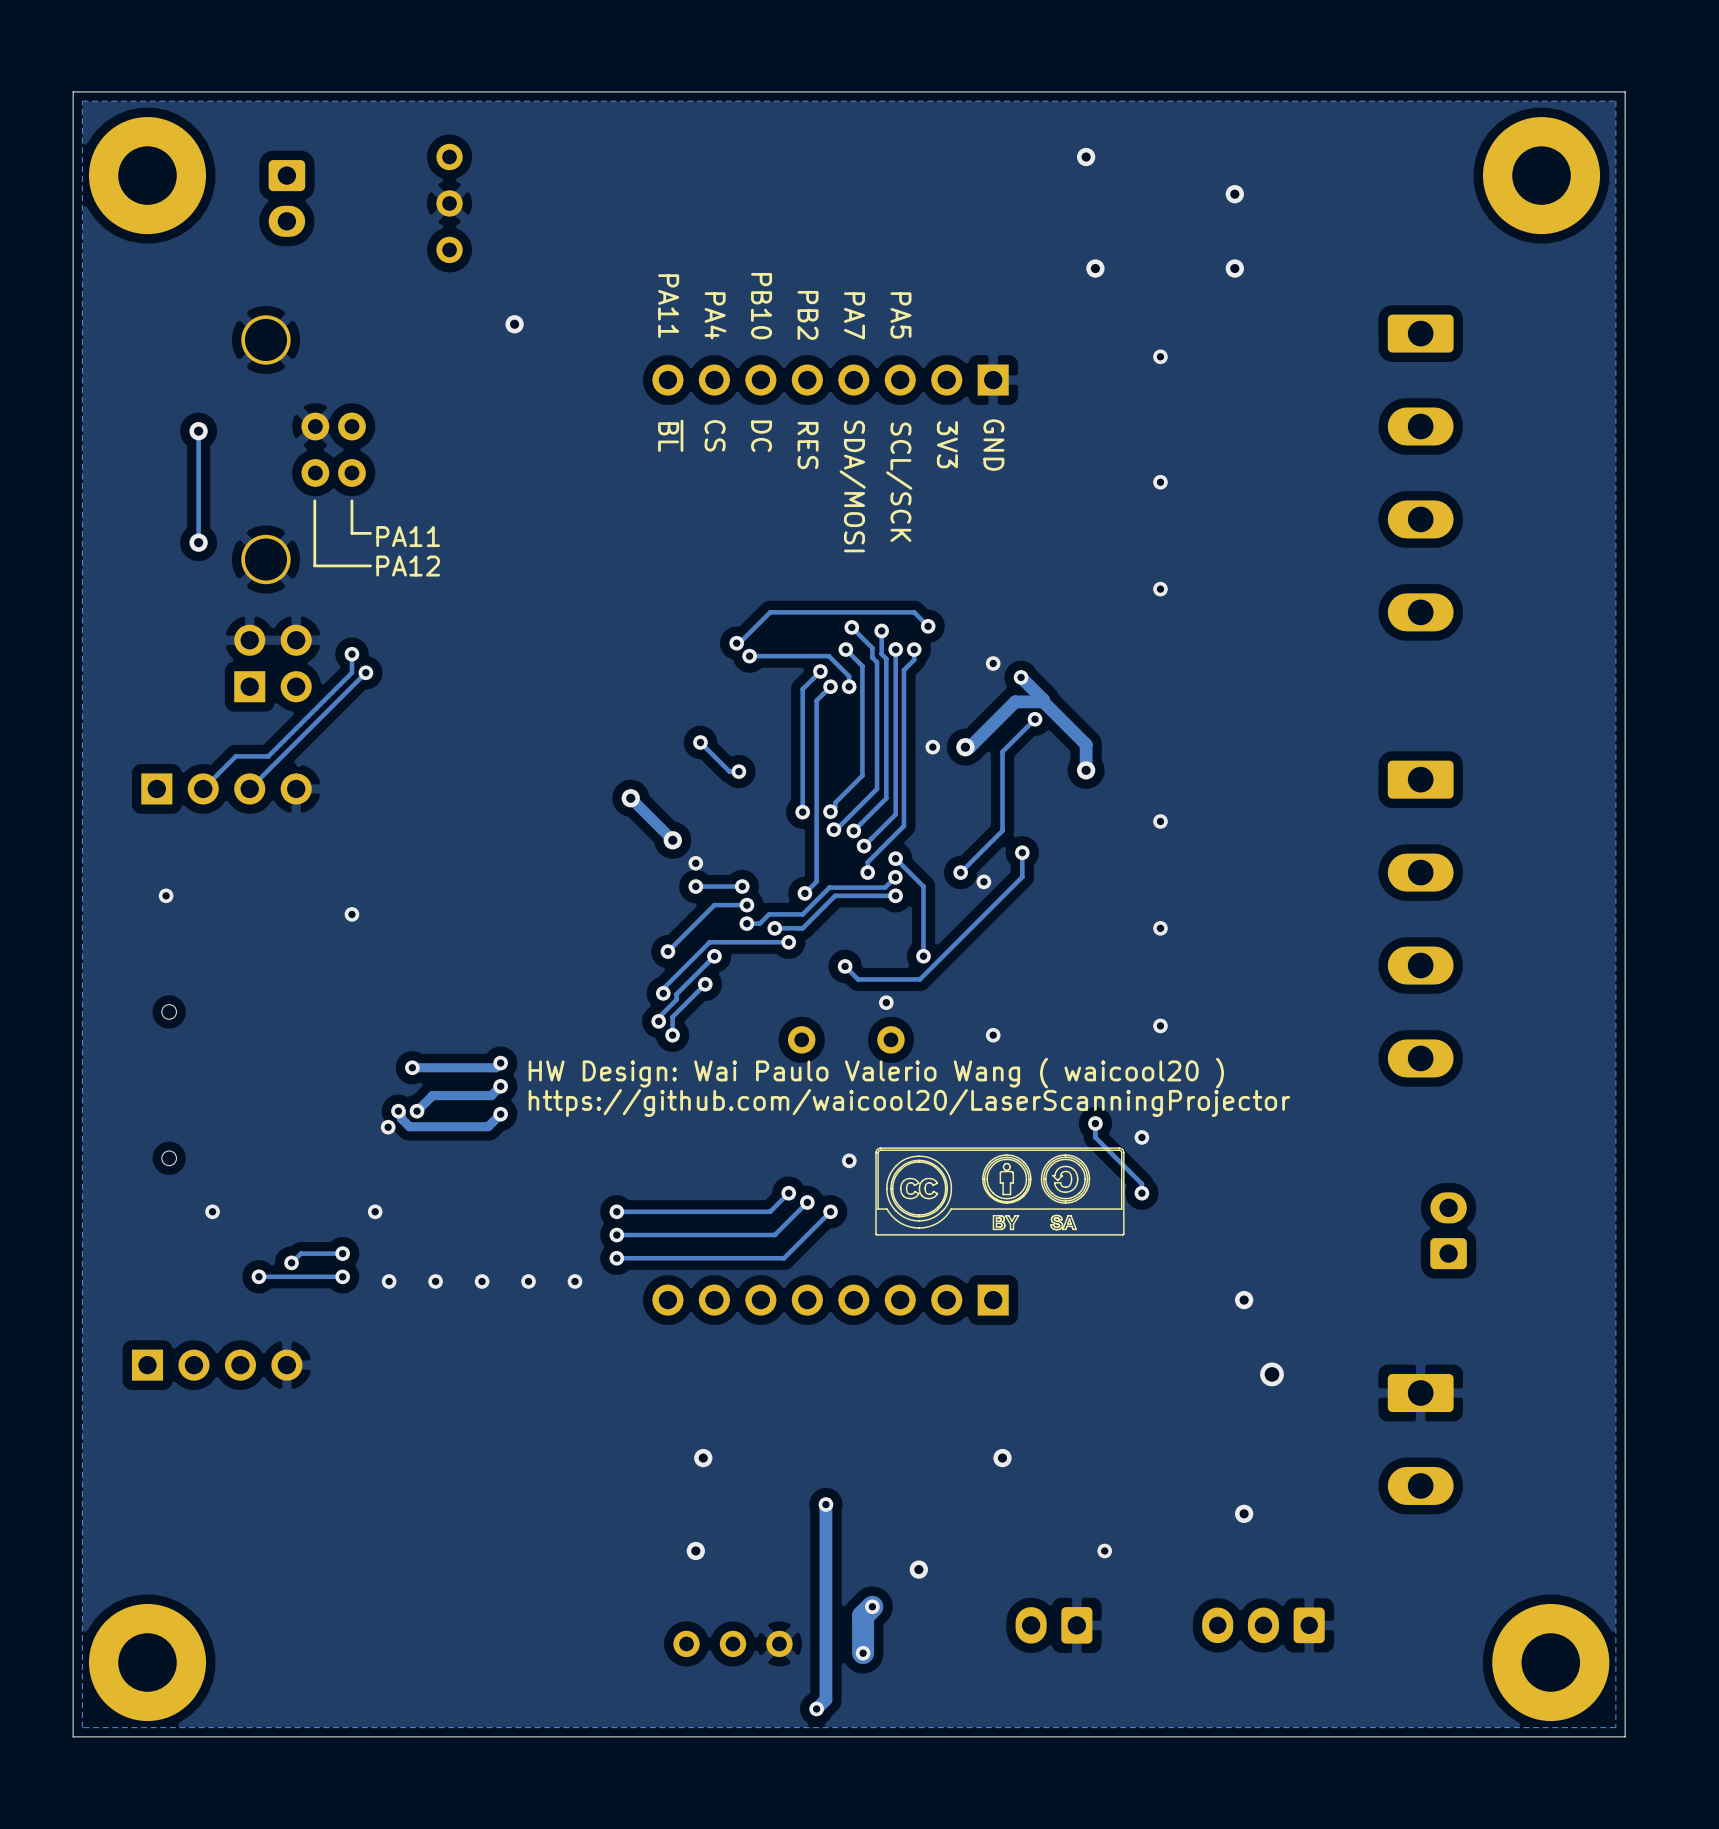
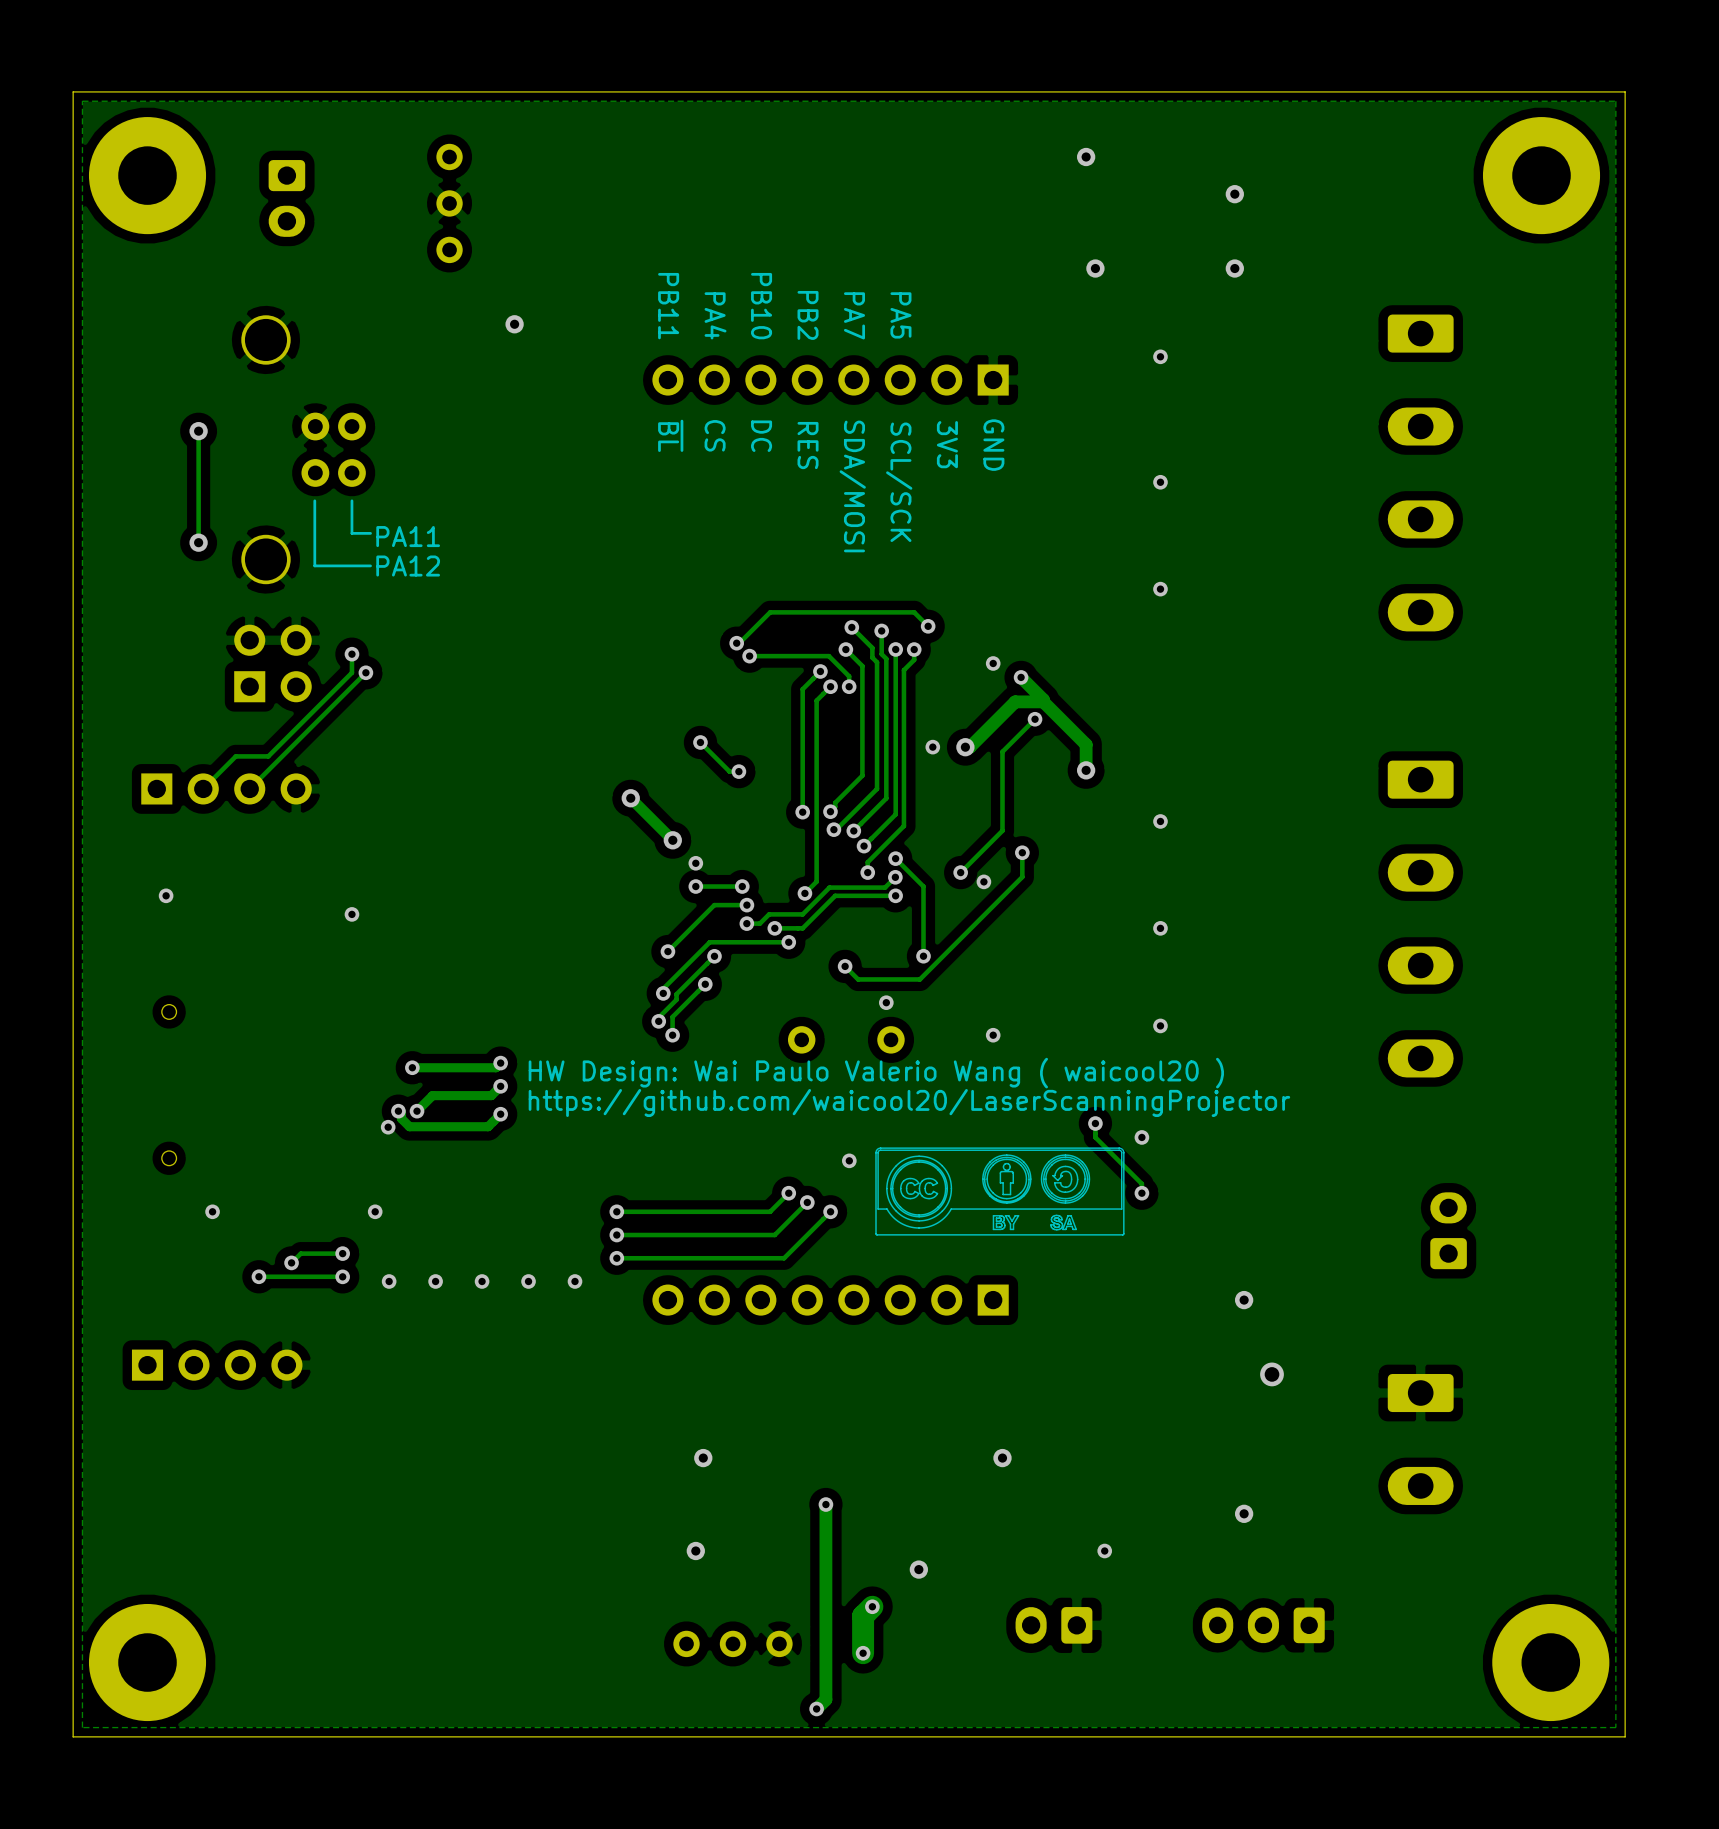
text: PA11 (668, 306) -> PB11 (668, 306)

